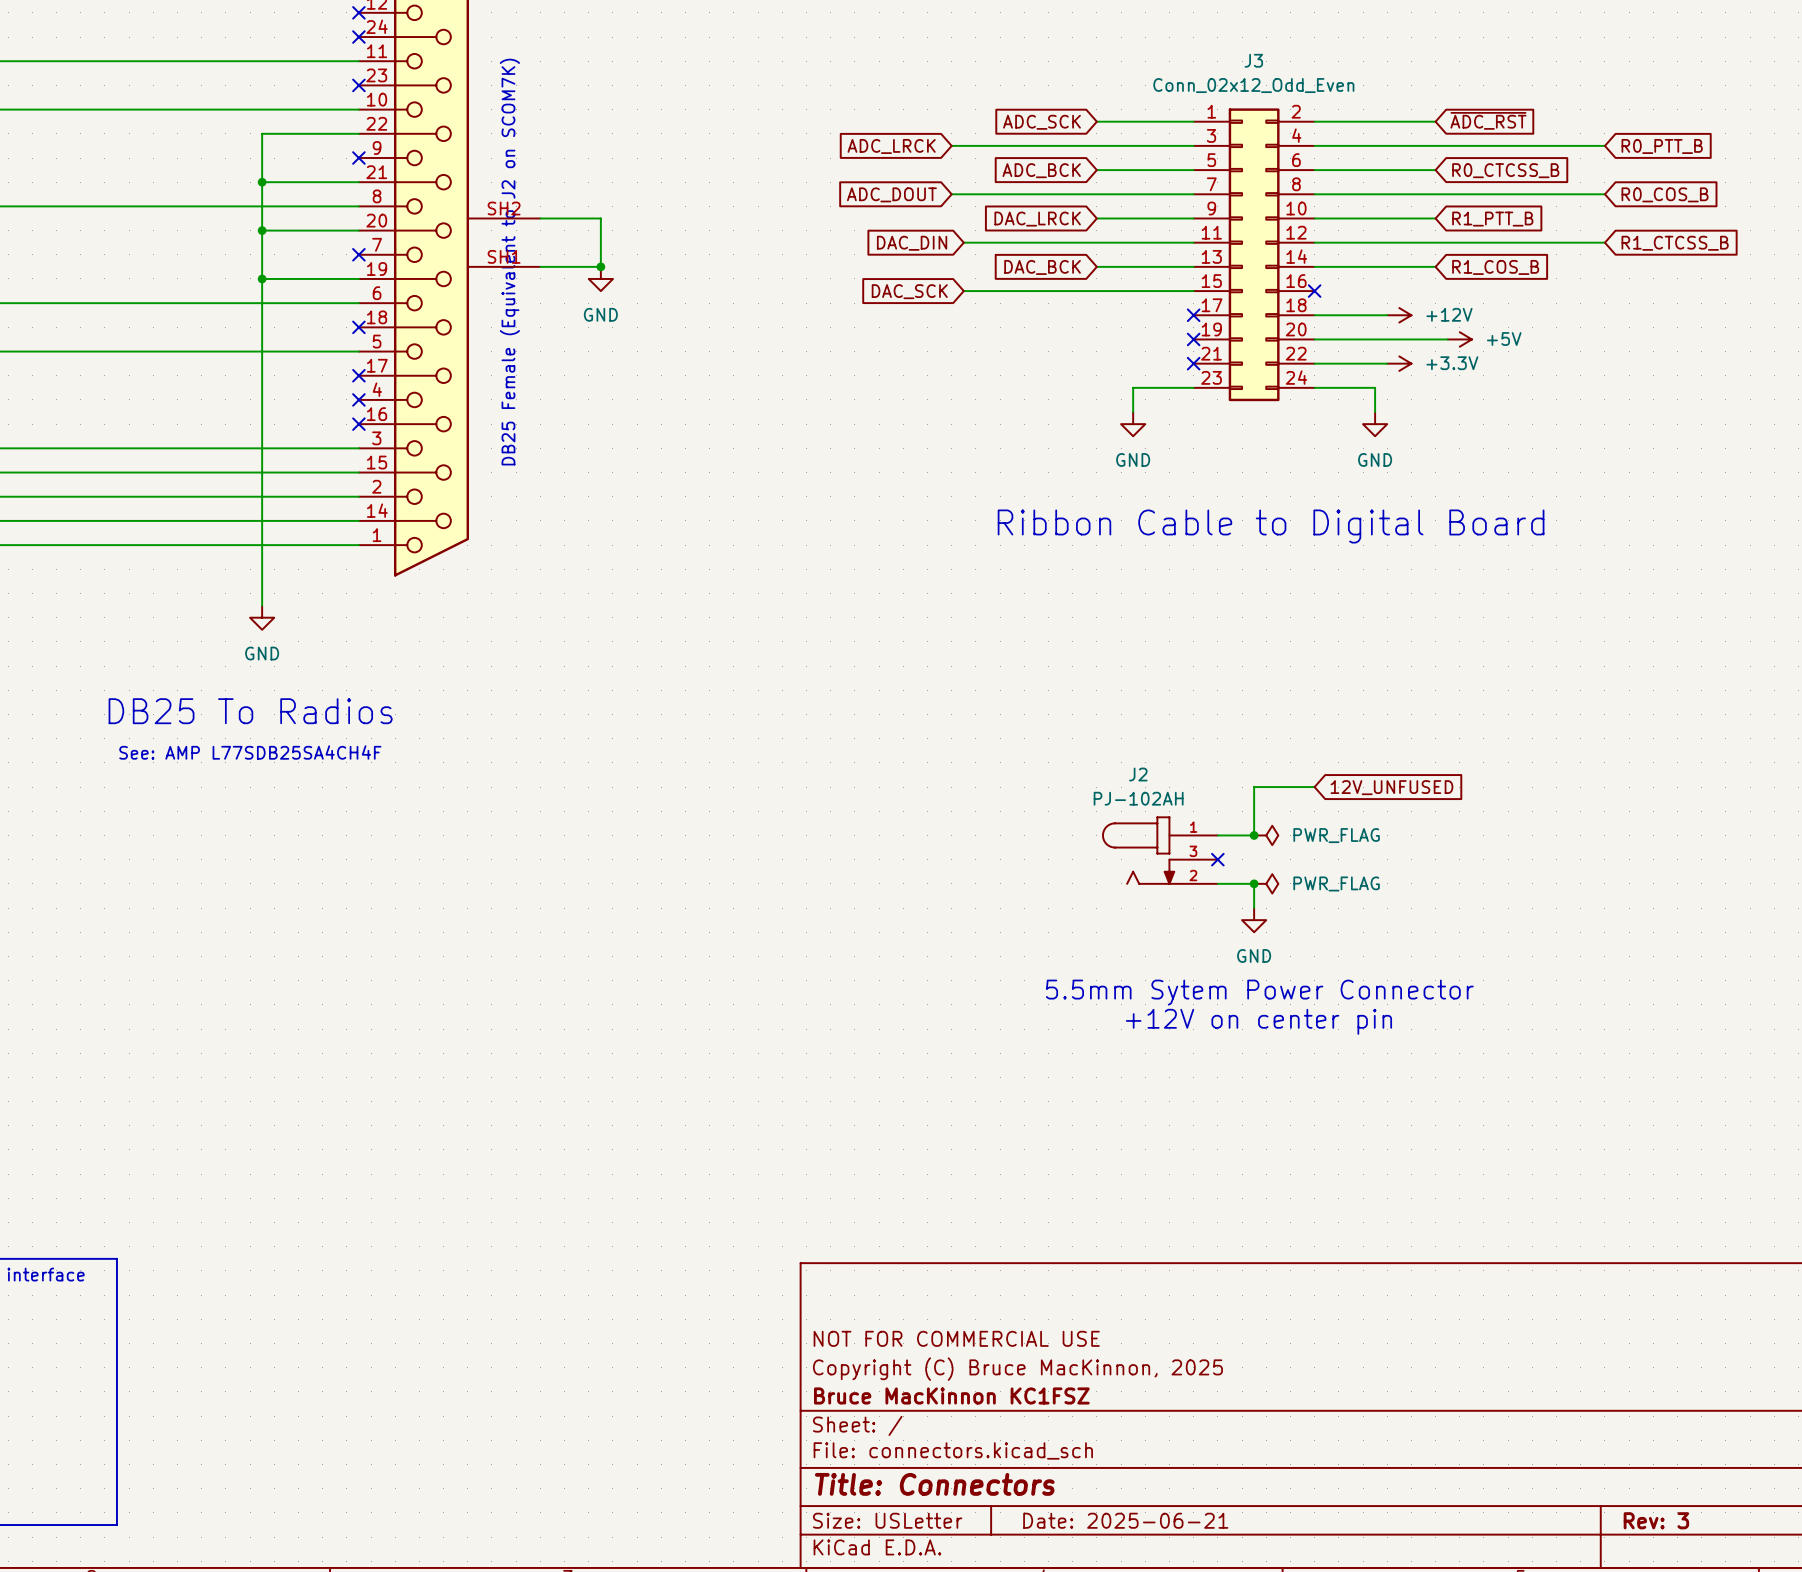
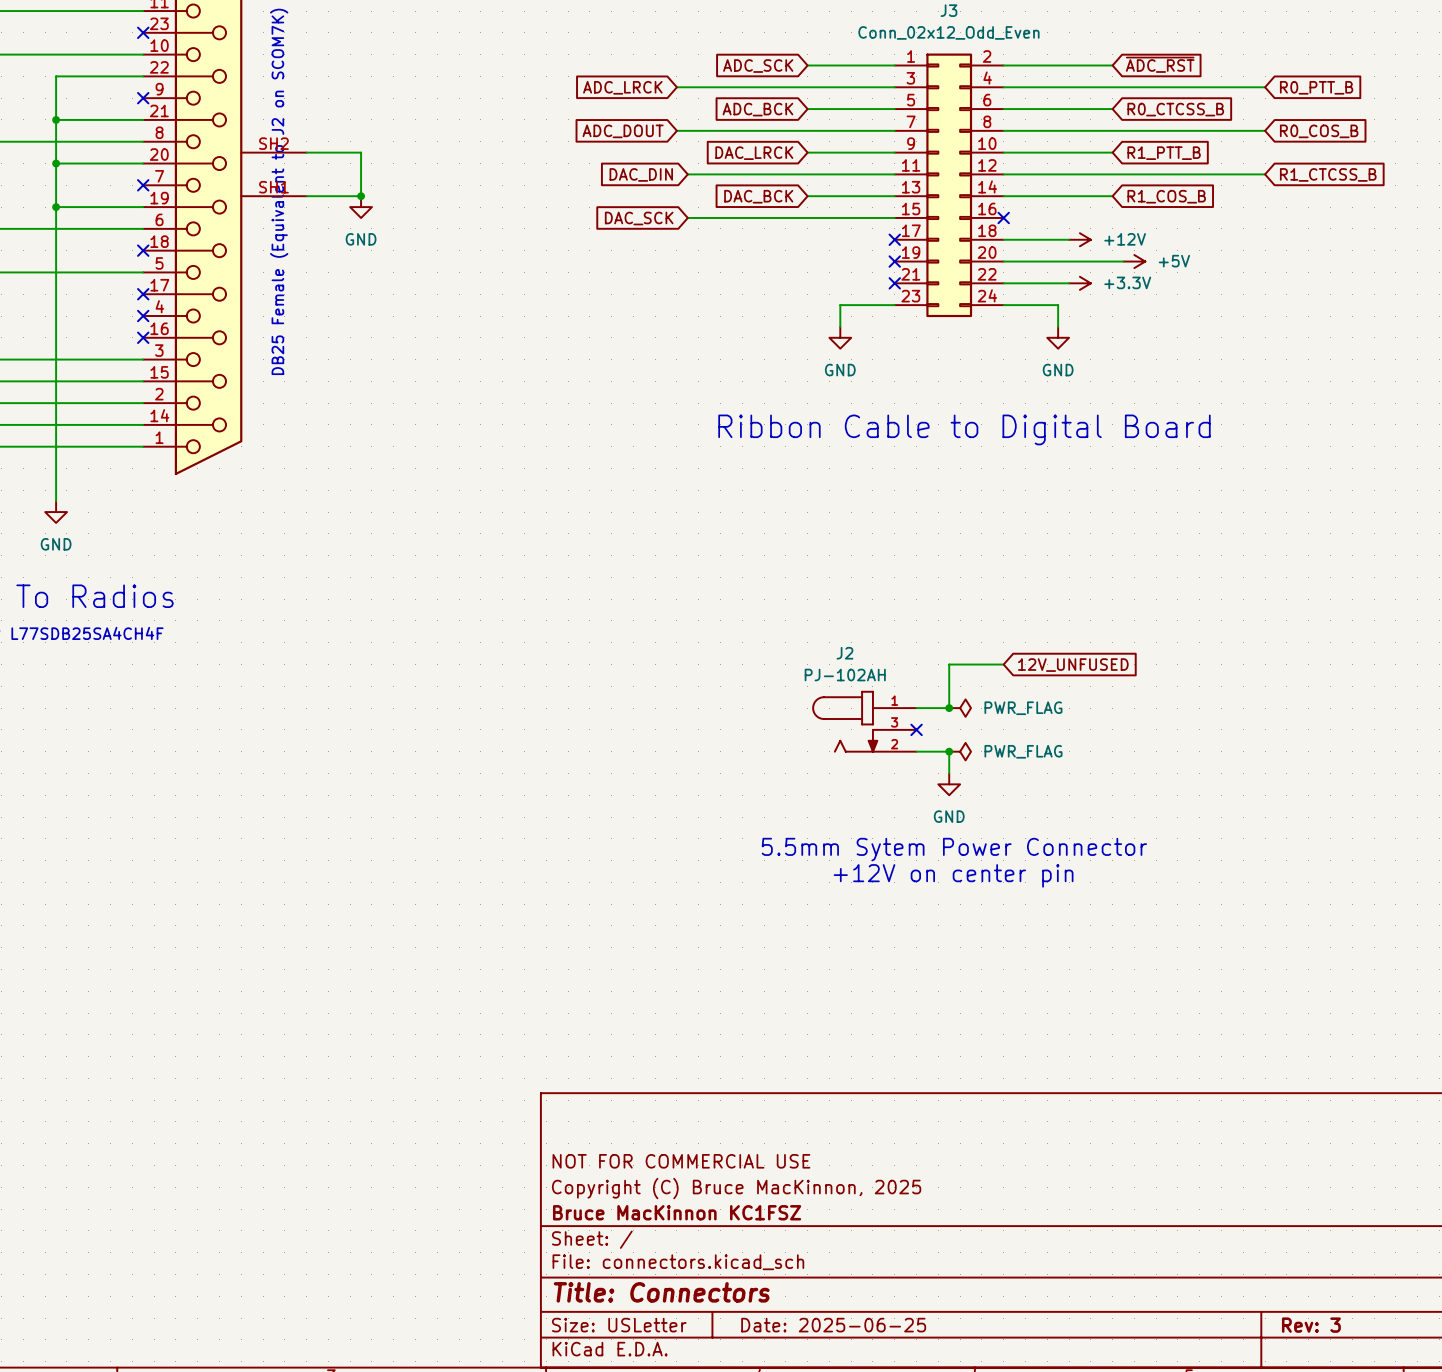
title block: Date: 2025-06-21 (1125, 1520) -> Date: 2025-06-25 (833, 1325)

